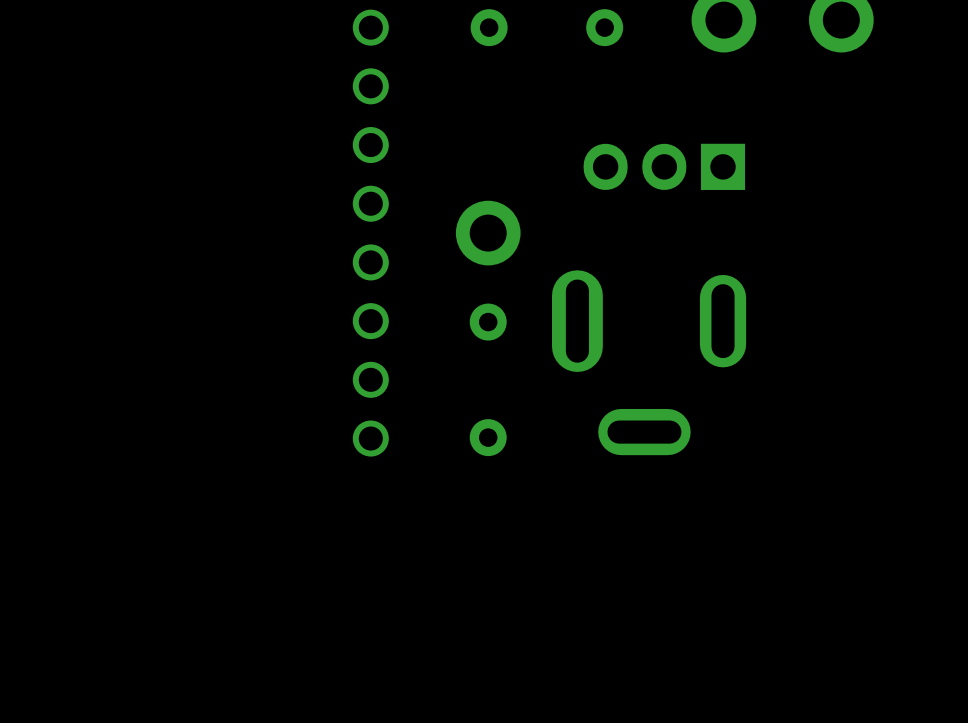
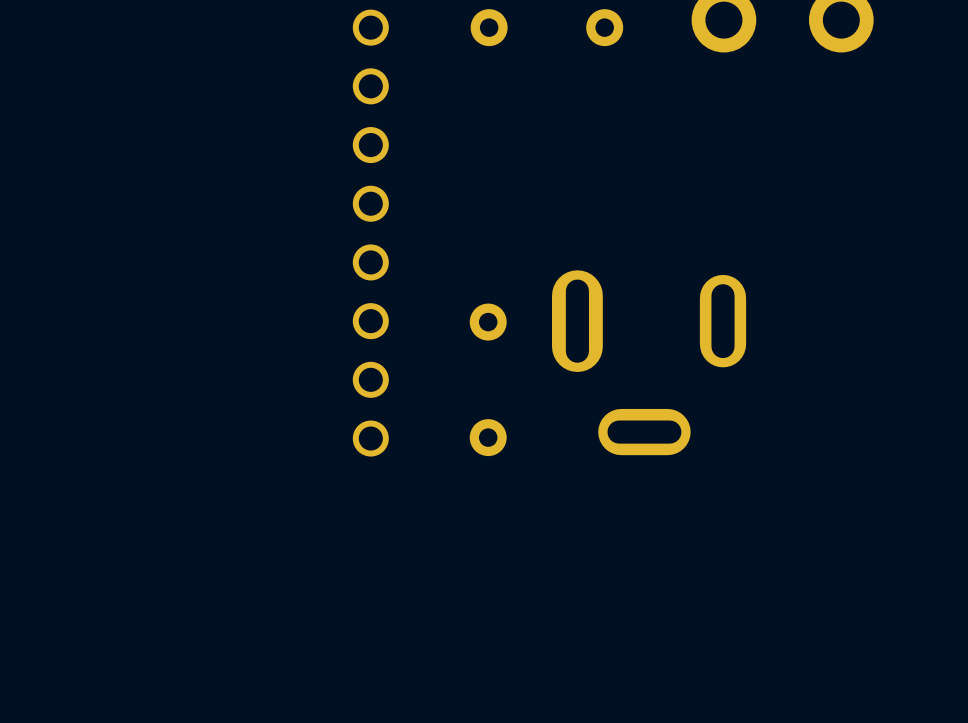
part: (664, 166) -> none
part: (488, 233) -> none

